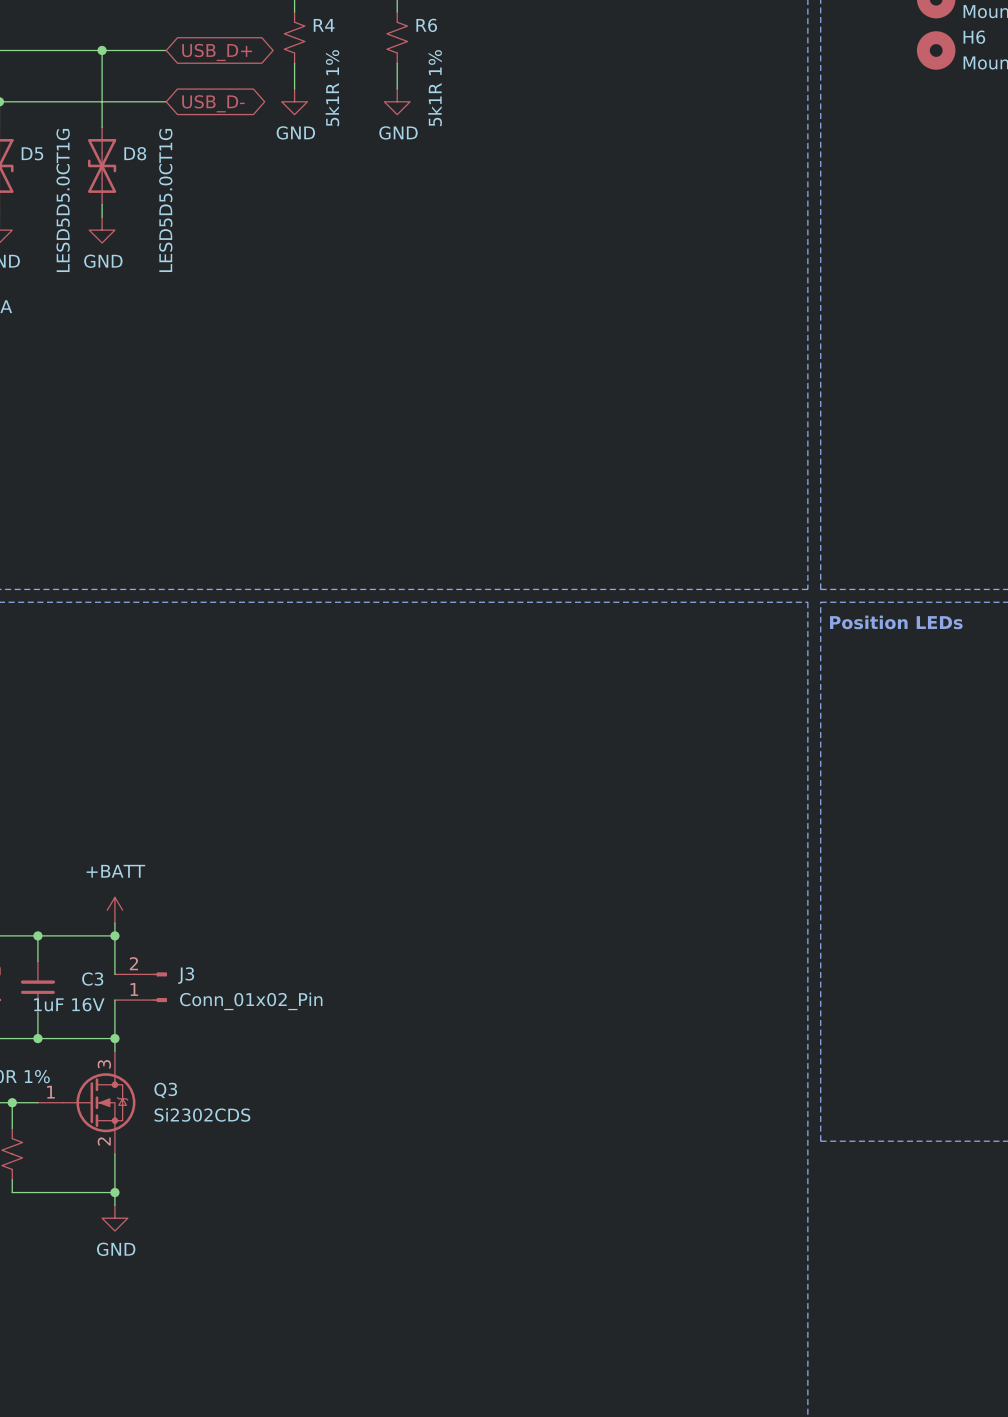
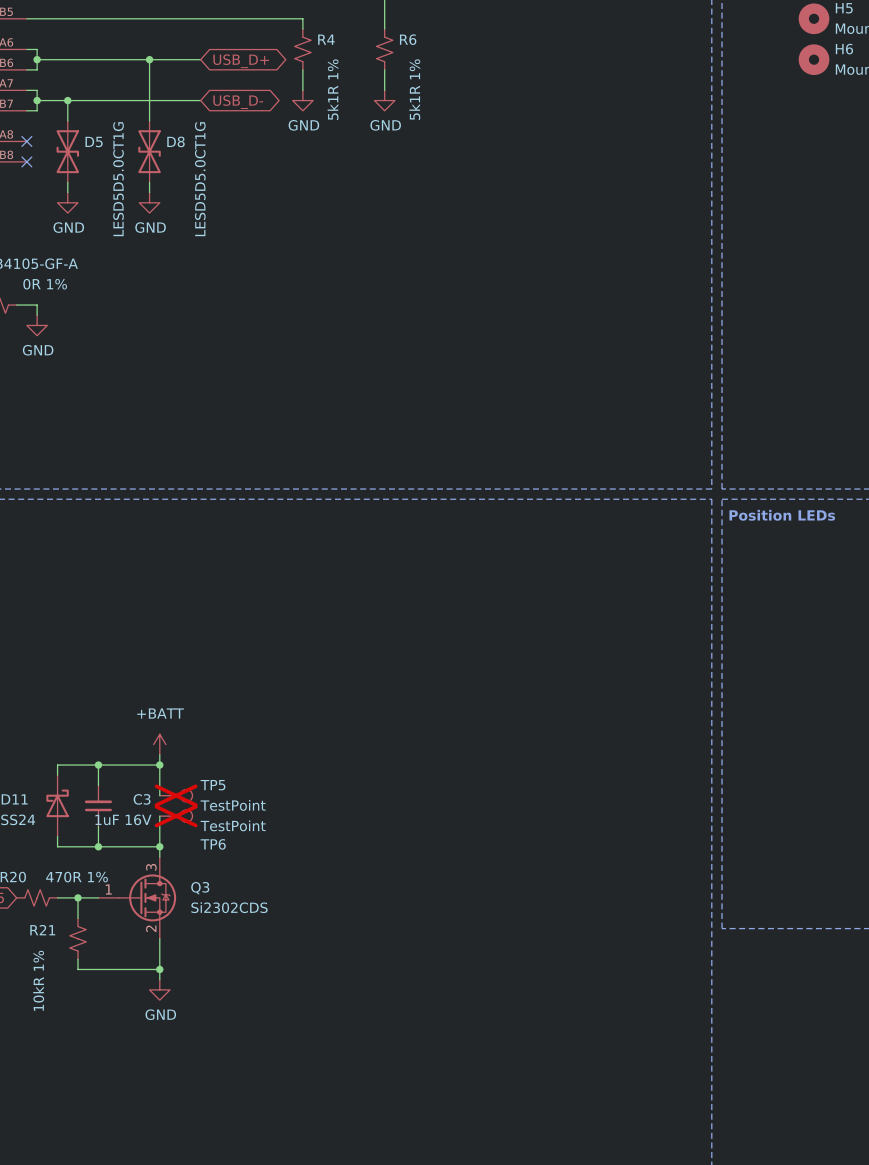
TP5: none -> TestPoint (176, 795)
J3: Conn_01x02_Pin (140, 987) -> none
TP6: none -> TestPoint (176, 816)

